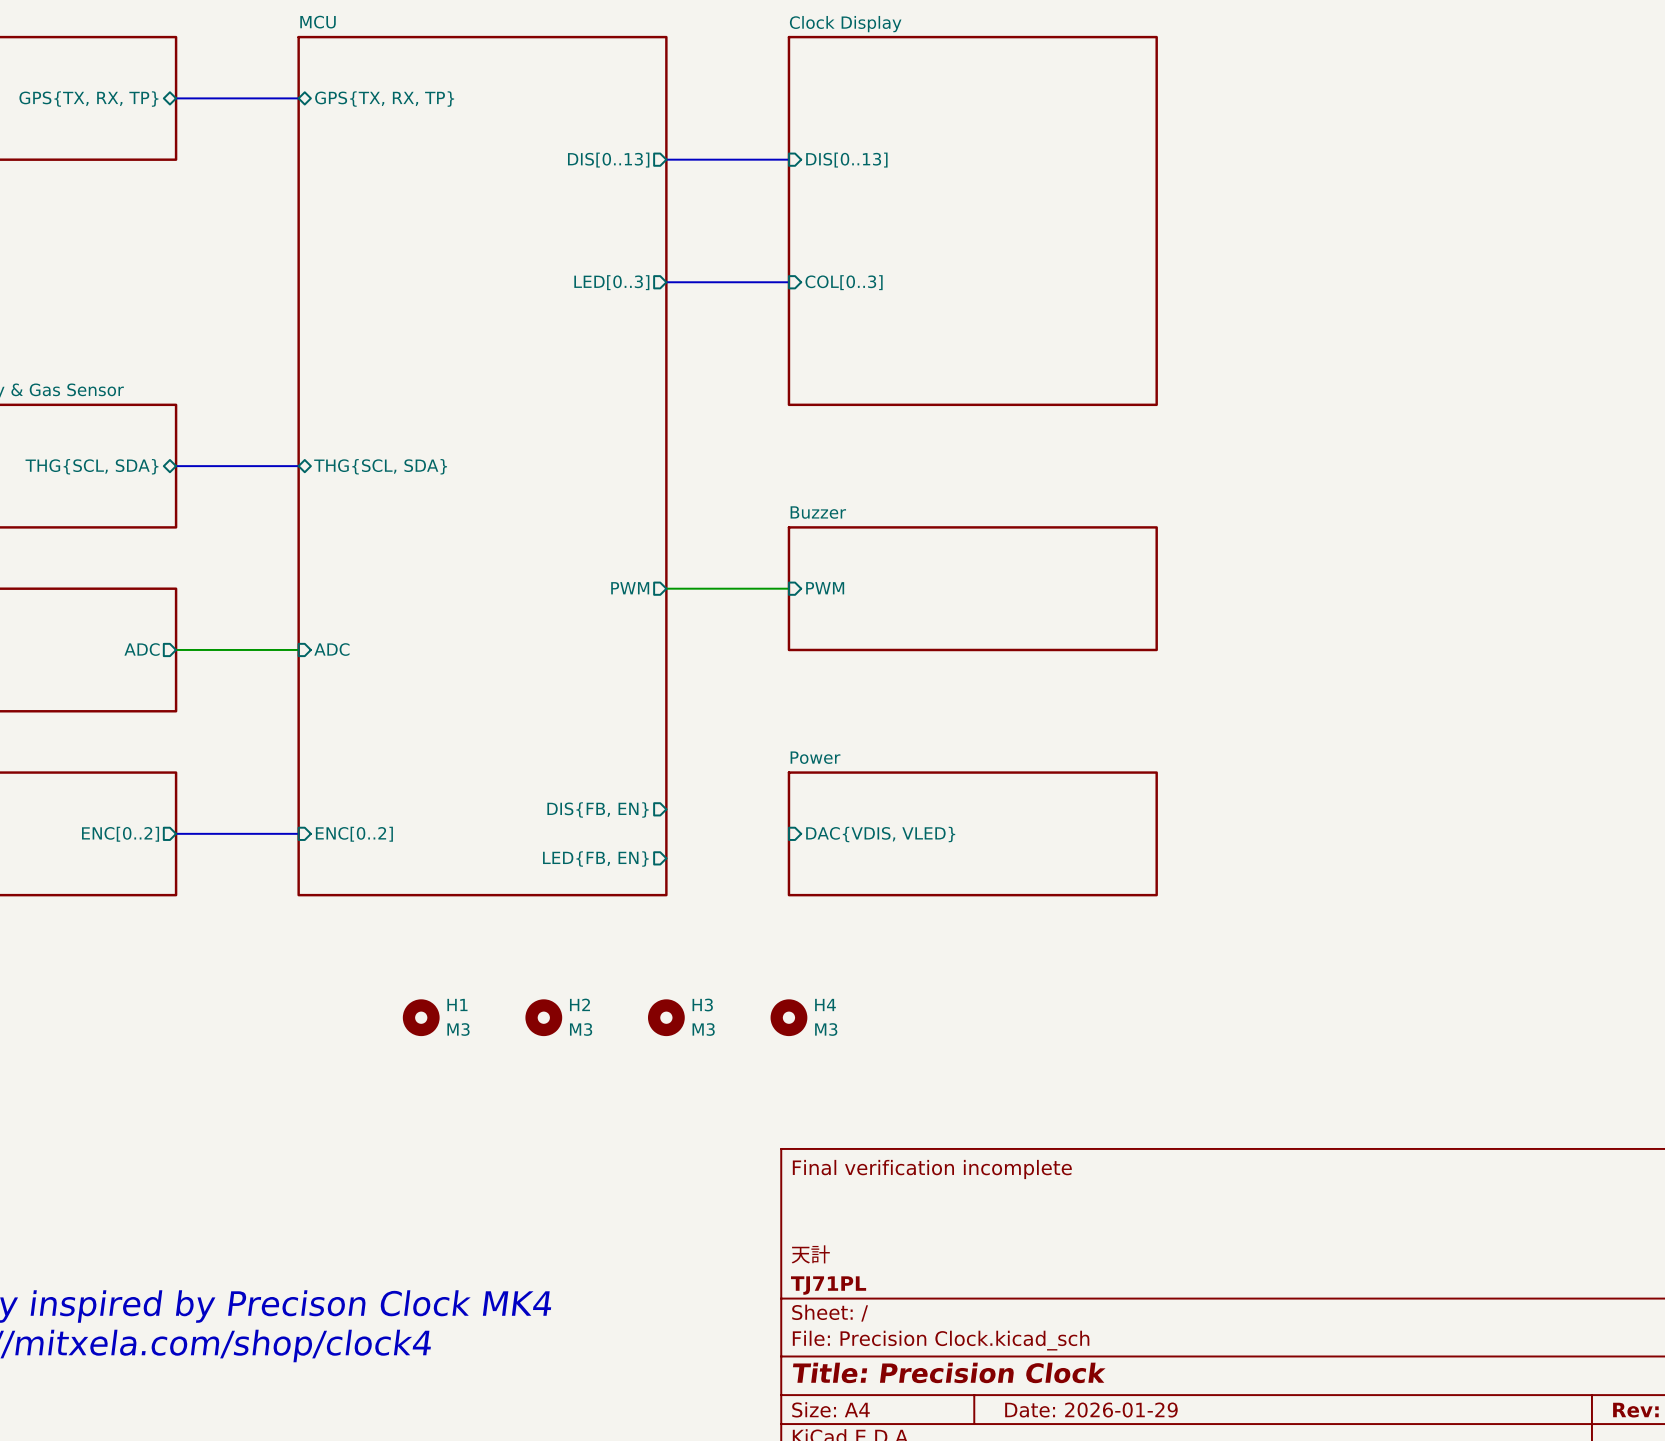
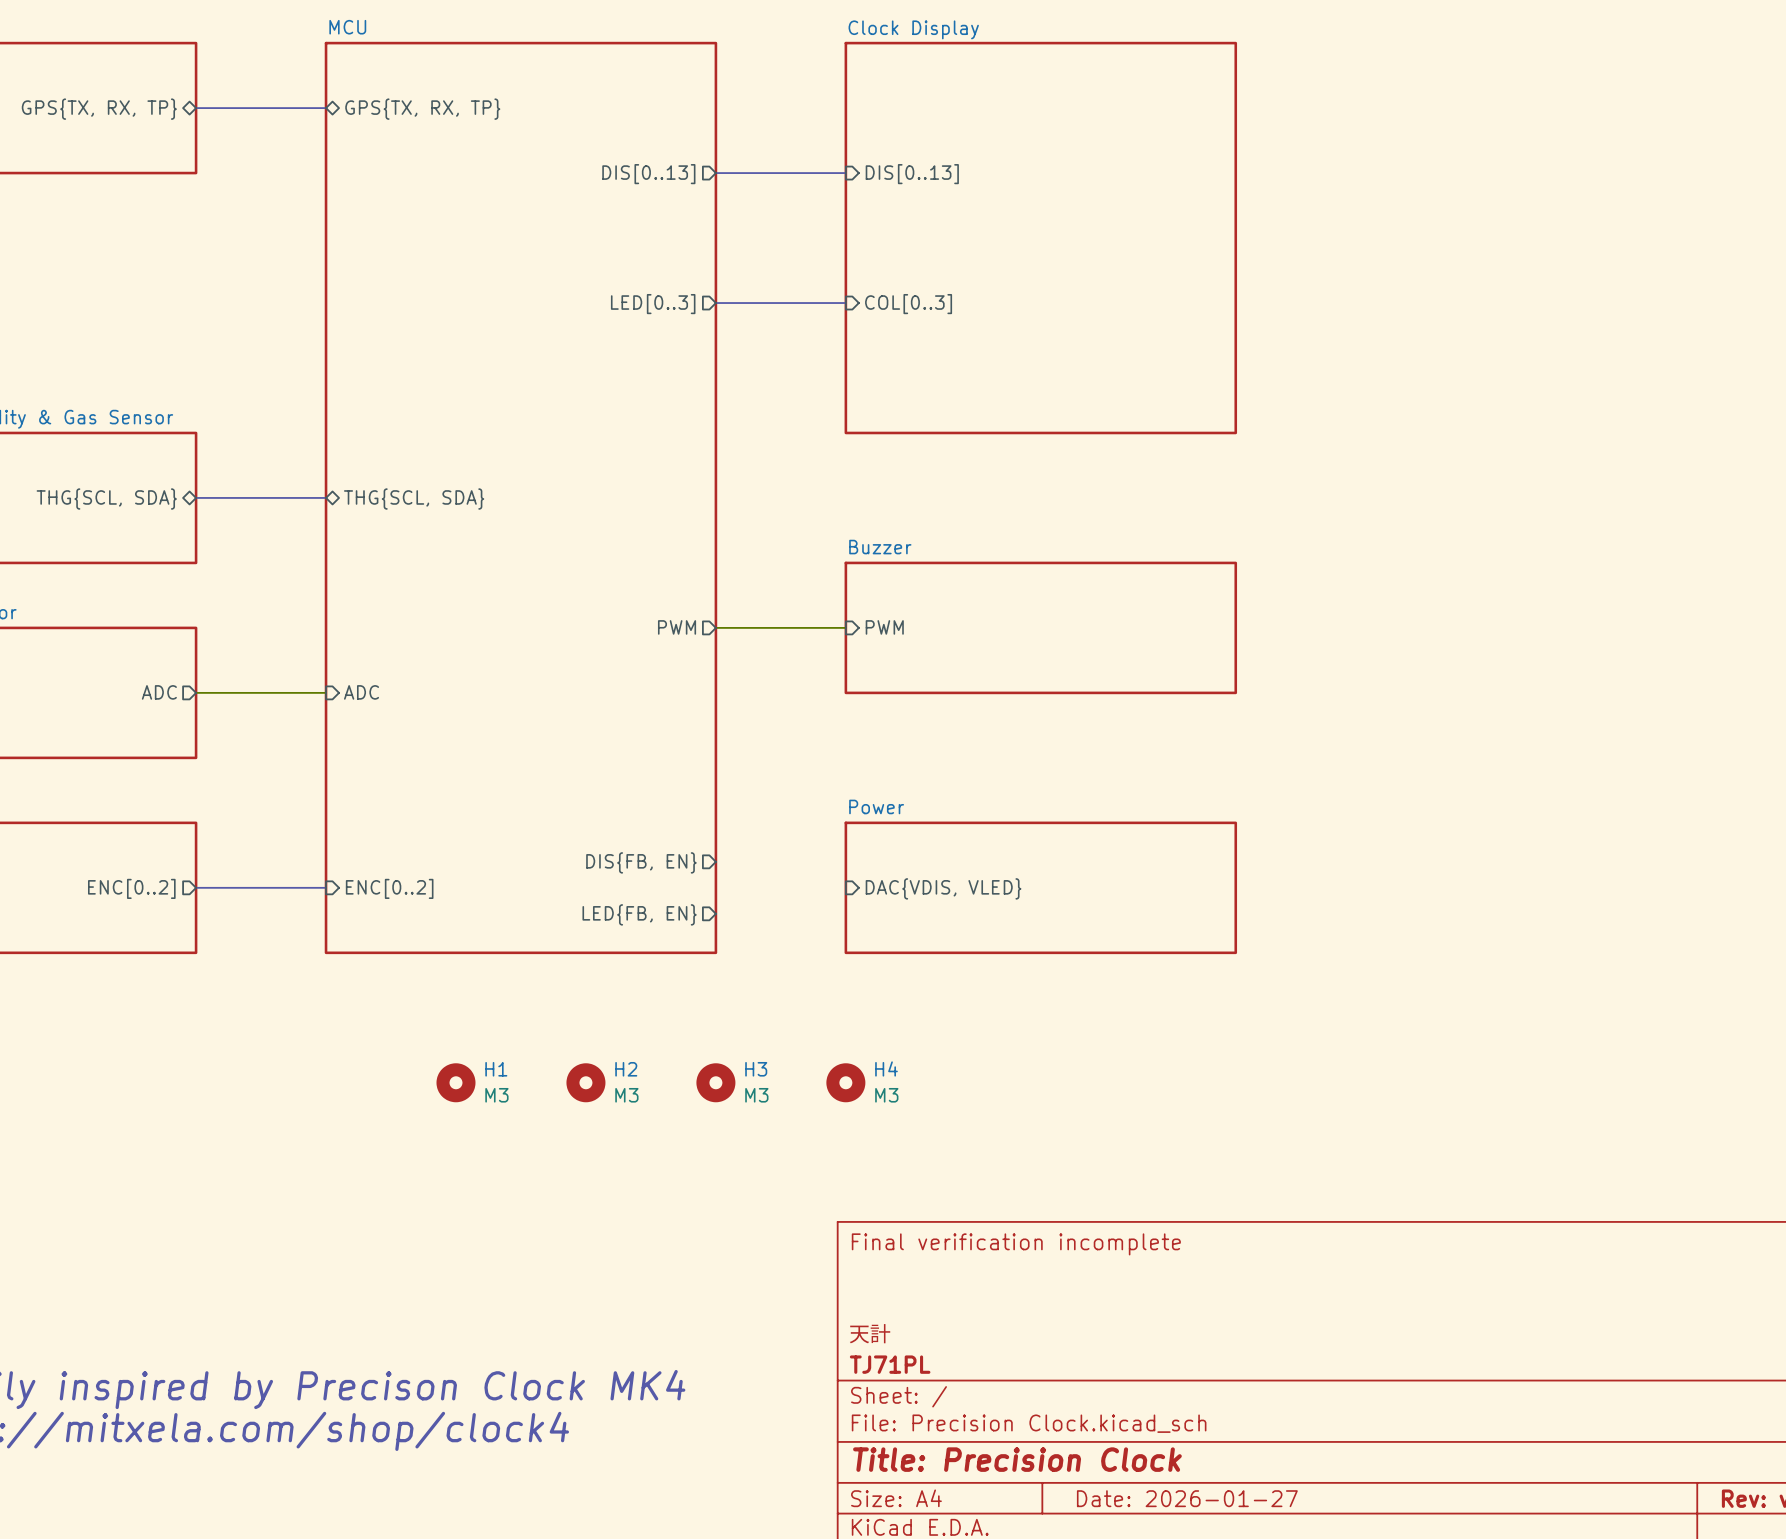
title block: Date: 2026-01-29 (1091, 1410) -> Date: 2026-01-27 (1187, 1498)

